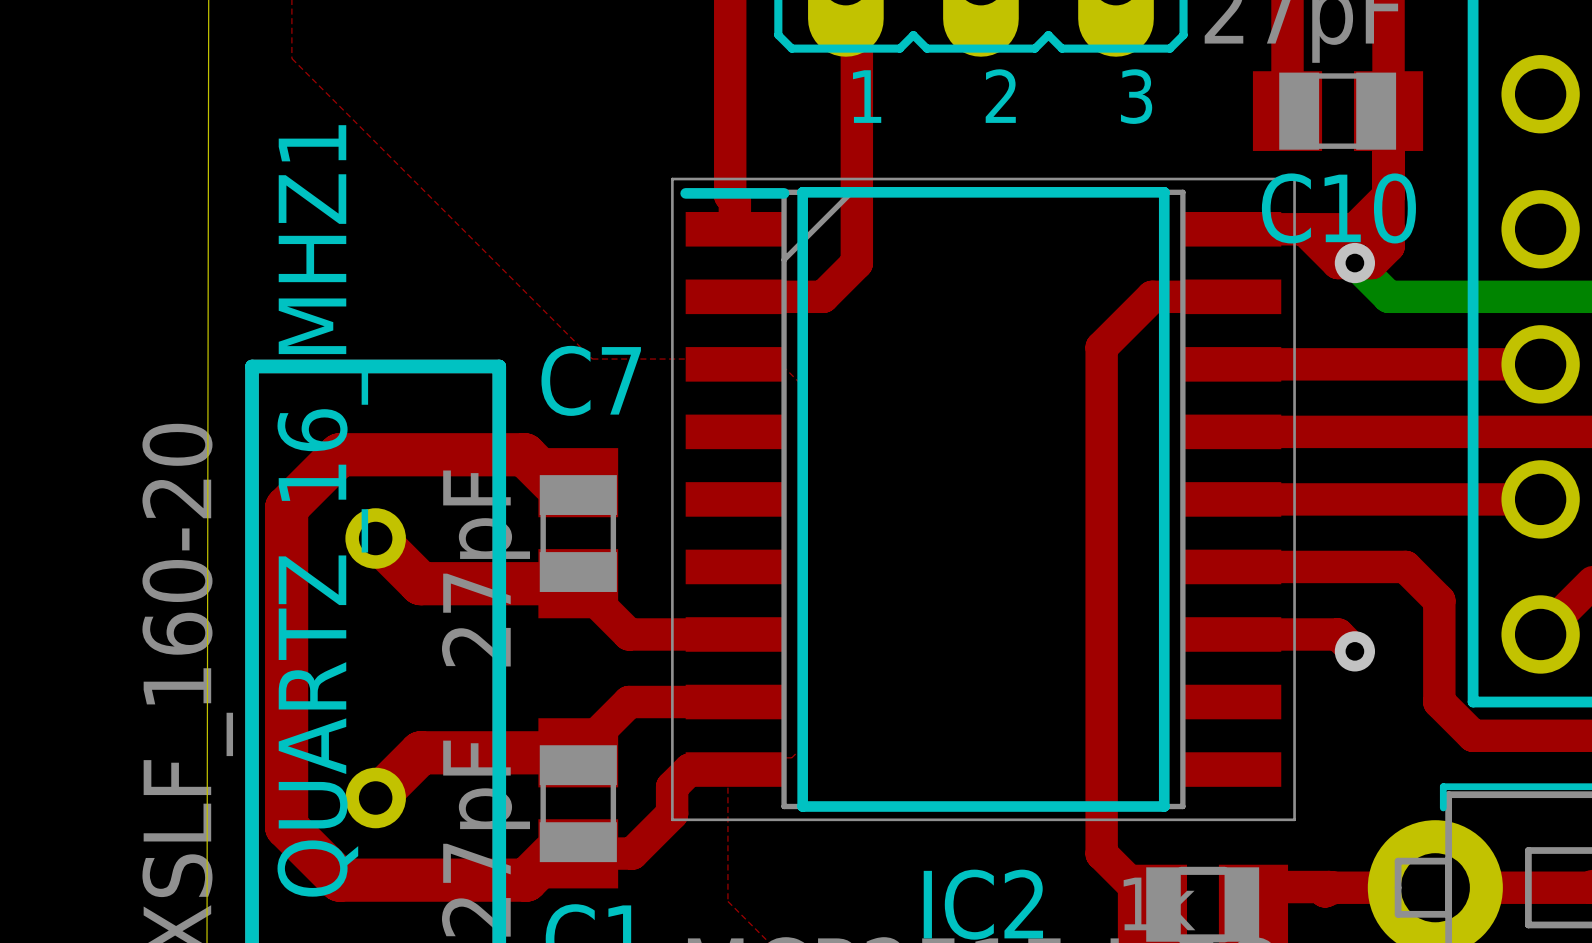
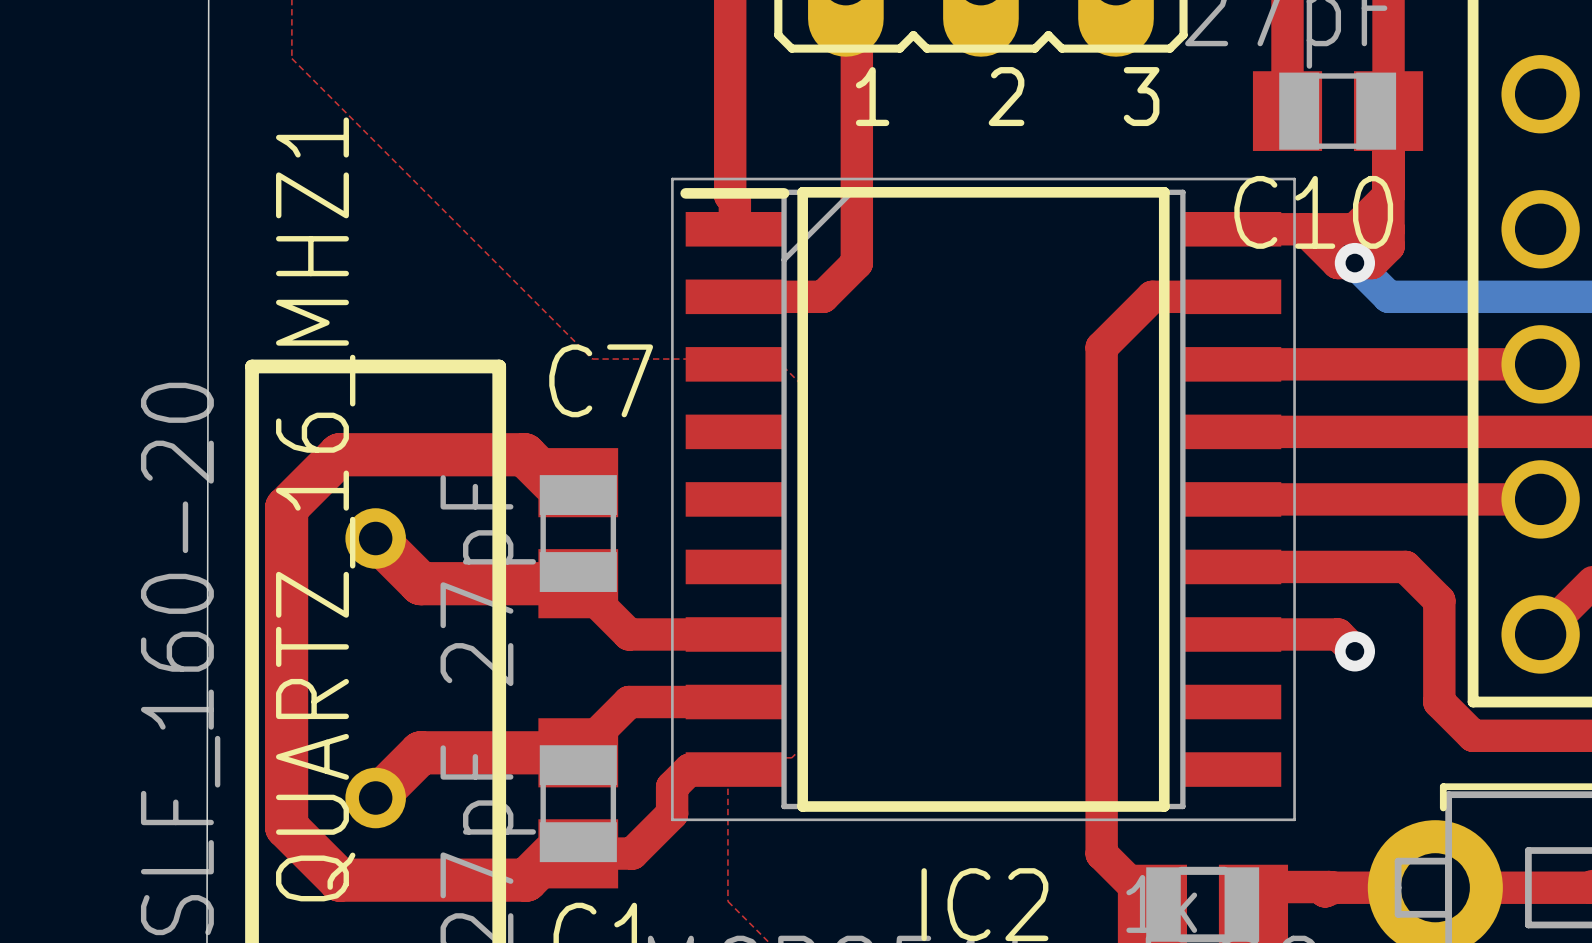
C10 name position: C10 (1338, 208) -> C10 (1313, 212)

